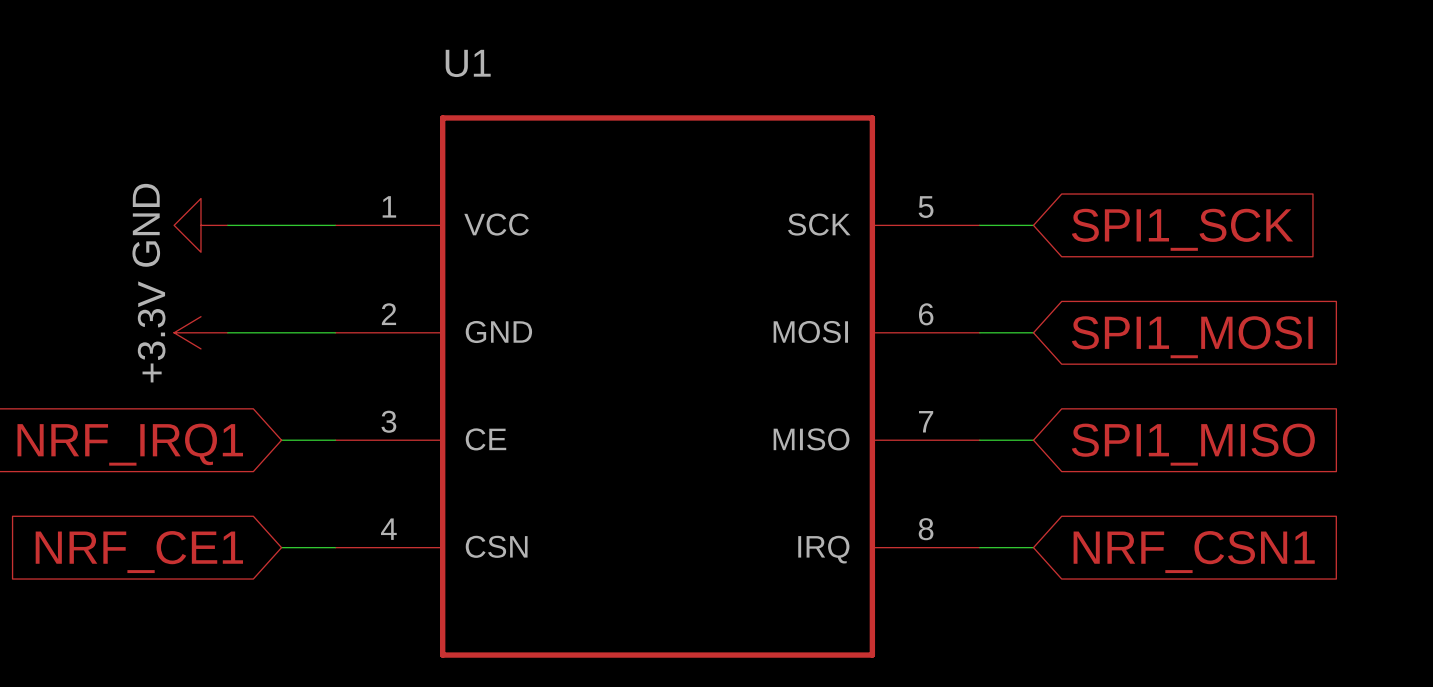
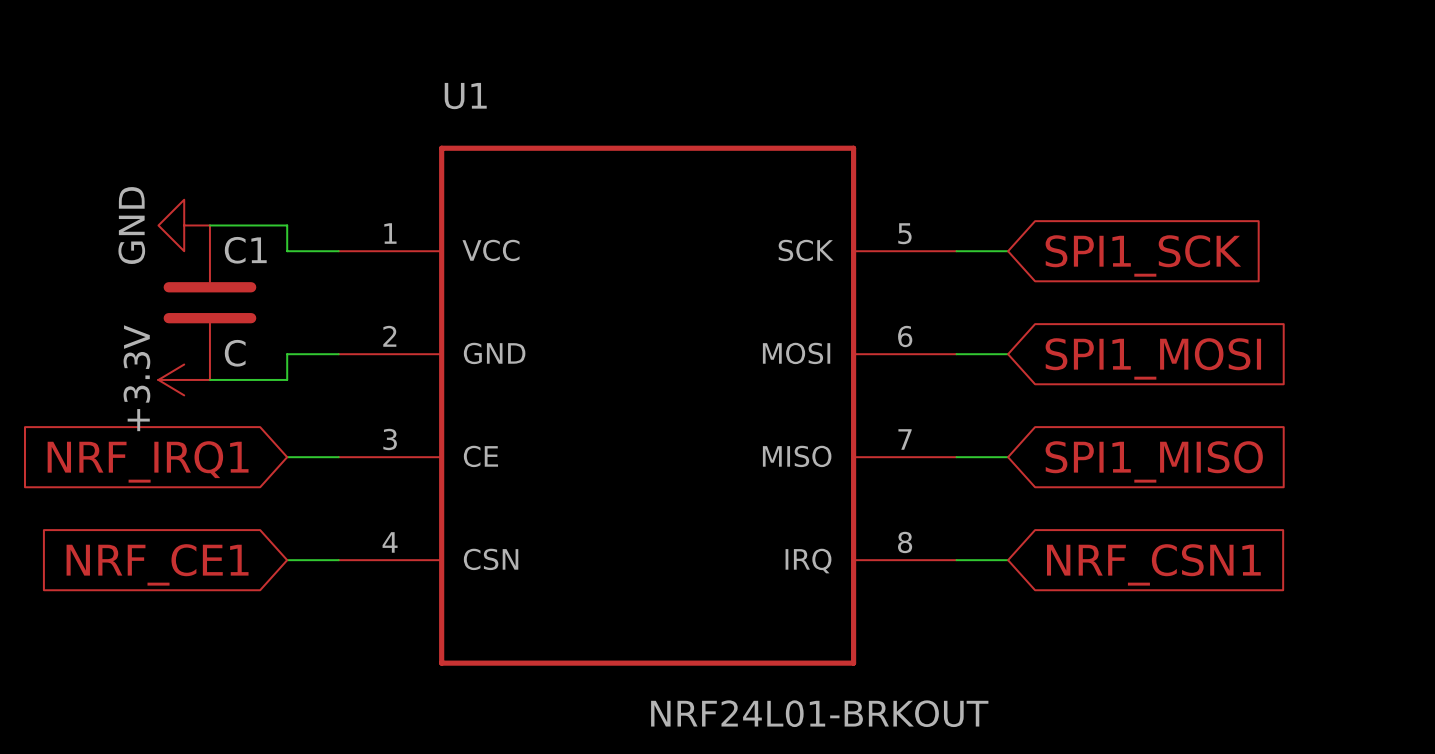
power symbol position: GND (200, 225) -> GND (184, 225)
wire: (227, 225) (281, 225) -> (209, 225) (287, 225) (287, 251)
C1: none -> C (209, 302)
power symbol position: +3.3V (200, 332) -> +3.3V (184, 379)
wire: (227, 332) (281, 332) -> (209, 379) (287, 379) (287, 354)

